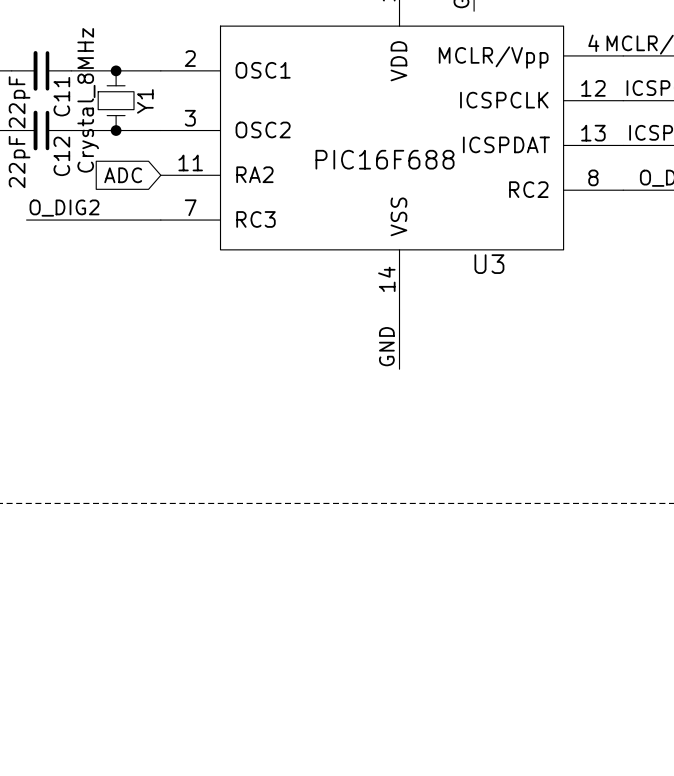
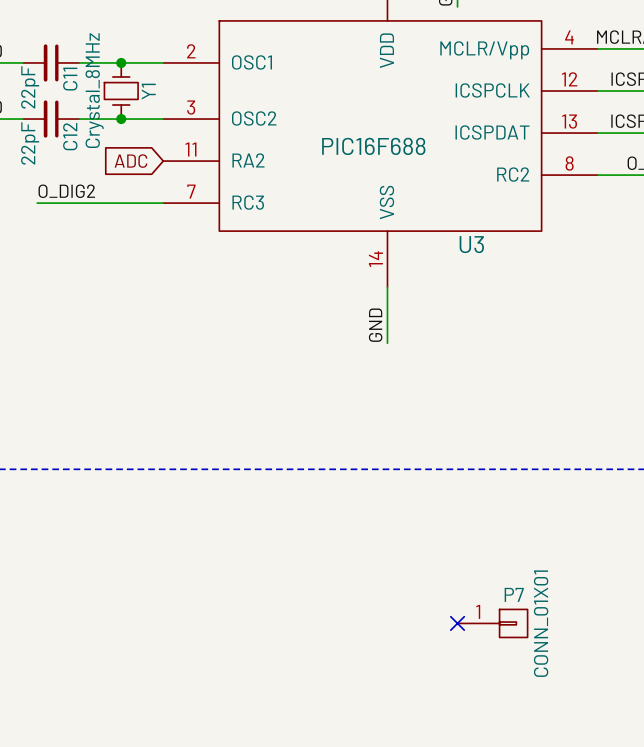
no-connect mark: none -> (457, 623)
P7: none -> CONN_01X01 (492, 623)

